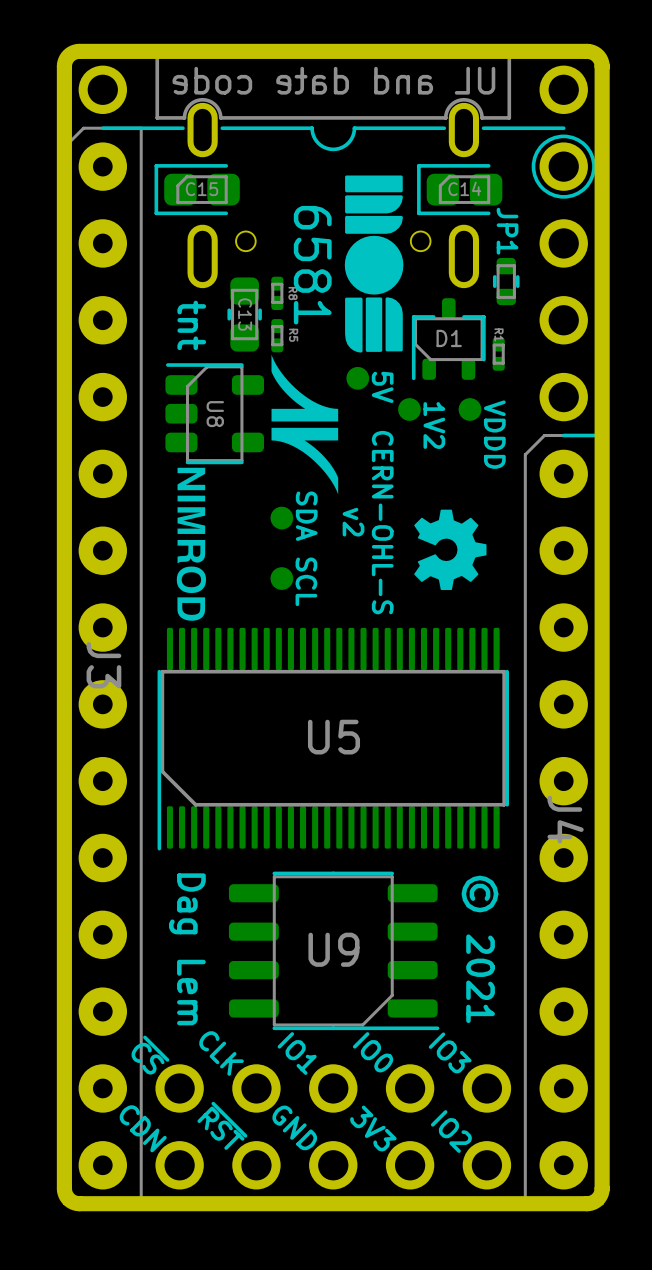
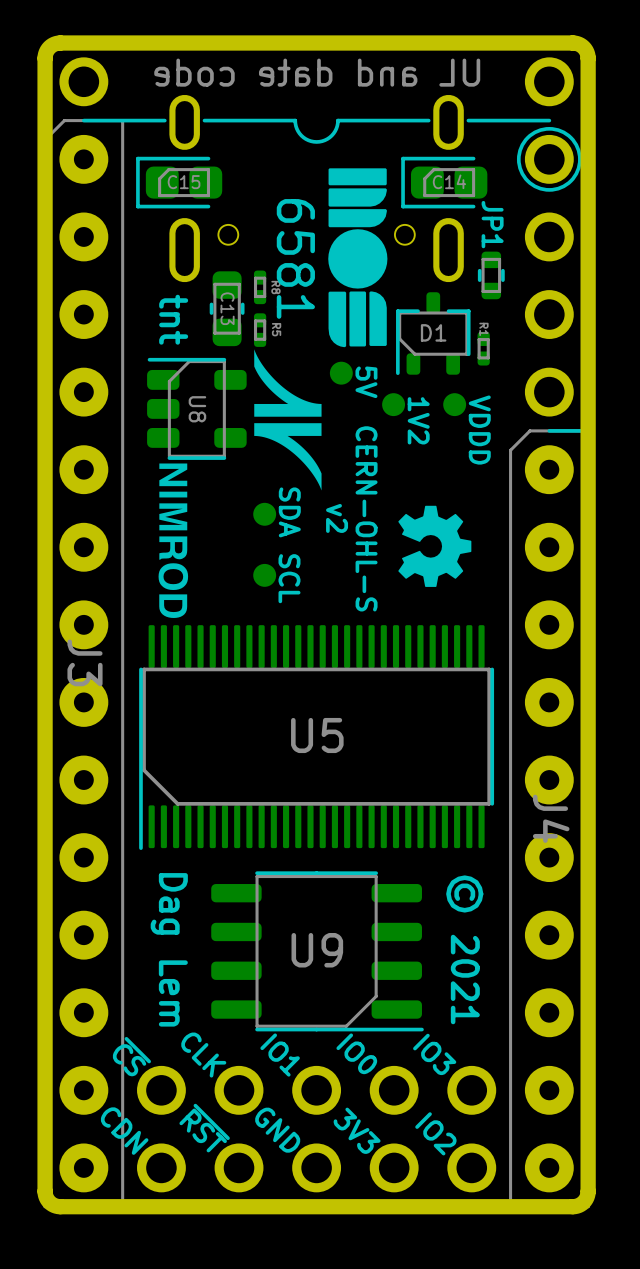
line: (509, 51) (509, 117) (482, 117) (476, 105) (463, 99) (451, 105) (445, 117) (220, 117) (215, 105) (202, 99) (189, 105) (184, 117) (157, 117) (157, 51) (508, 51) -> none

